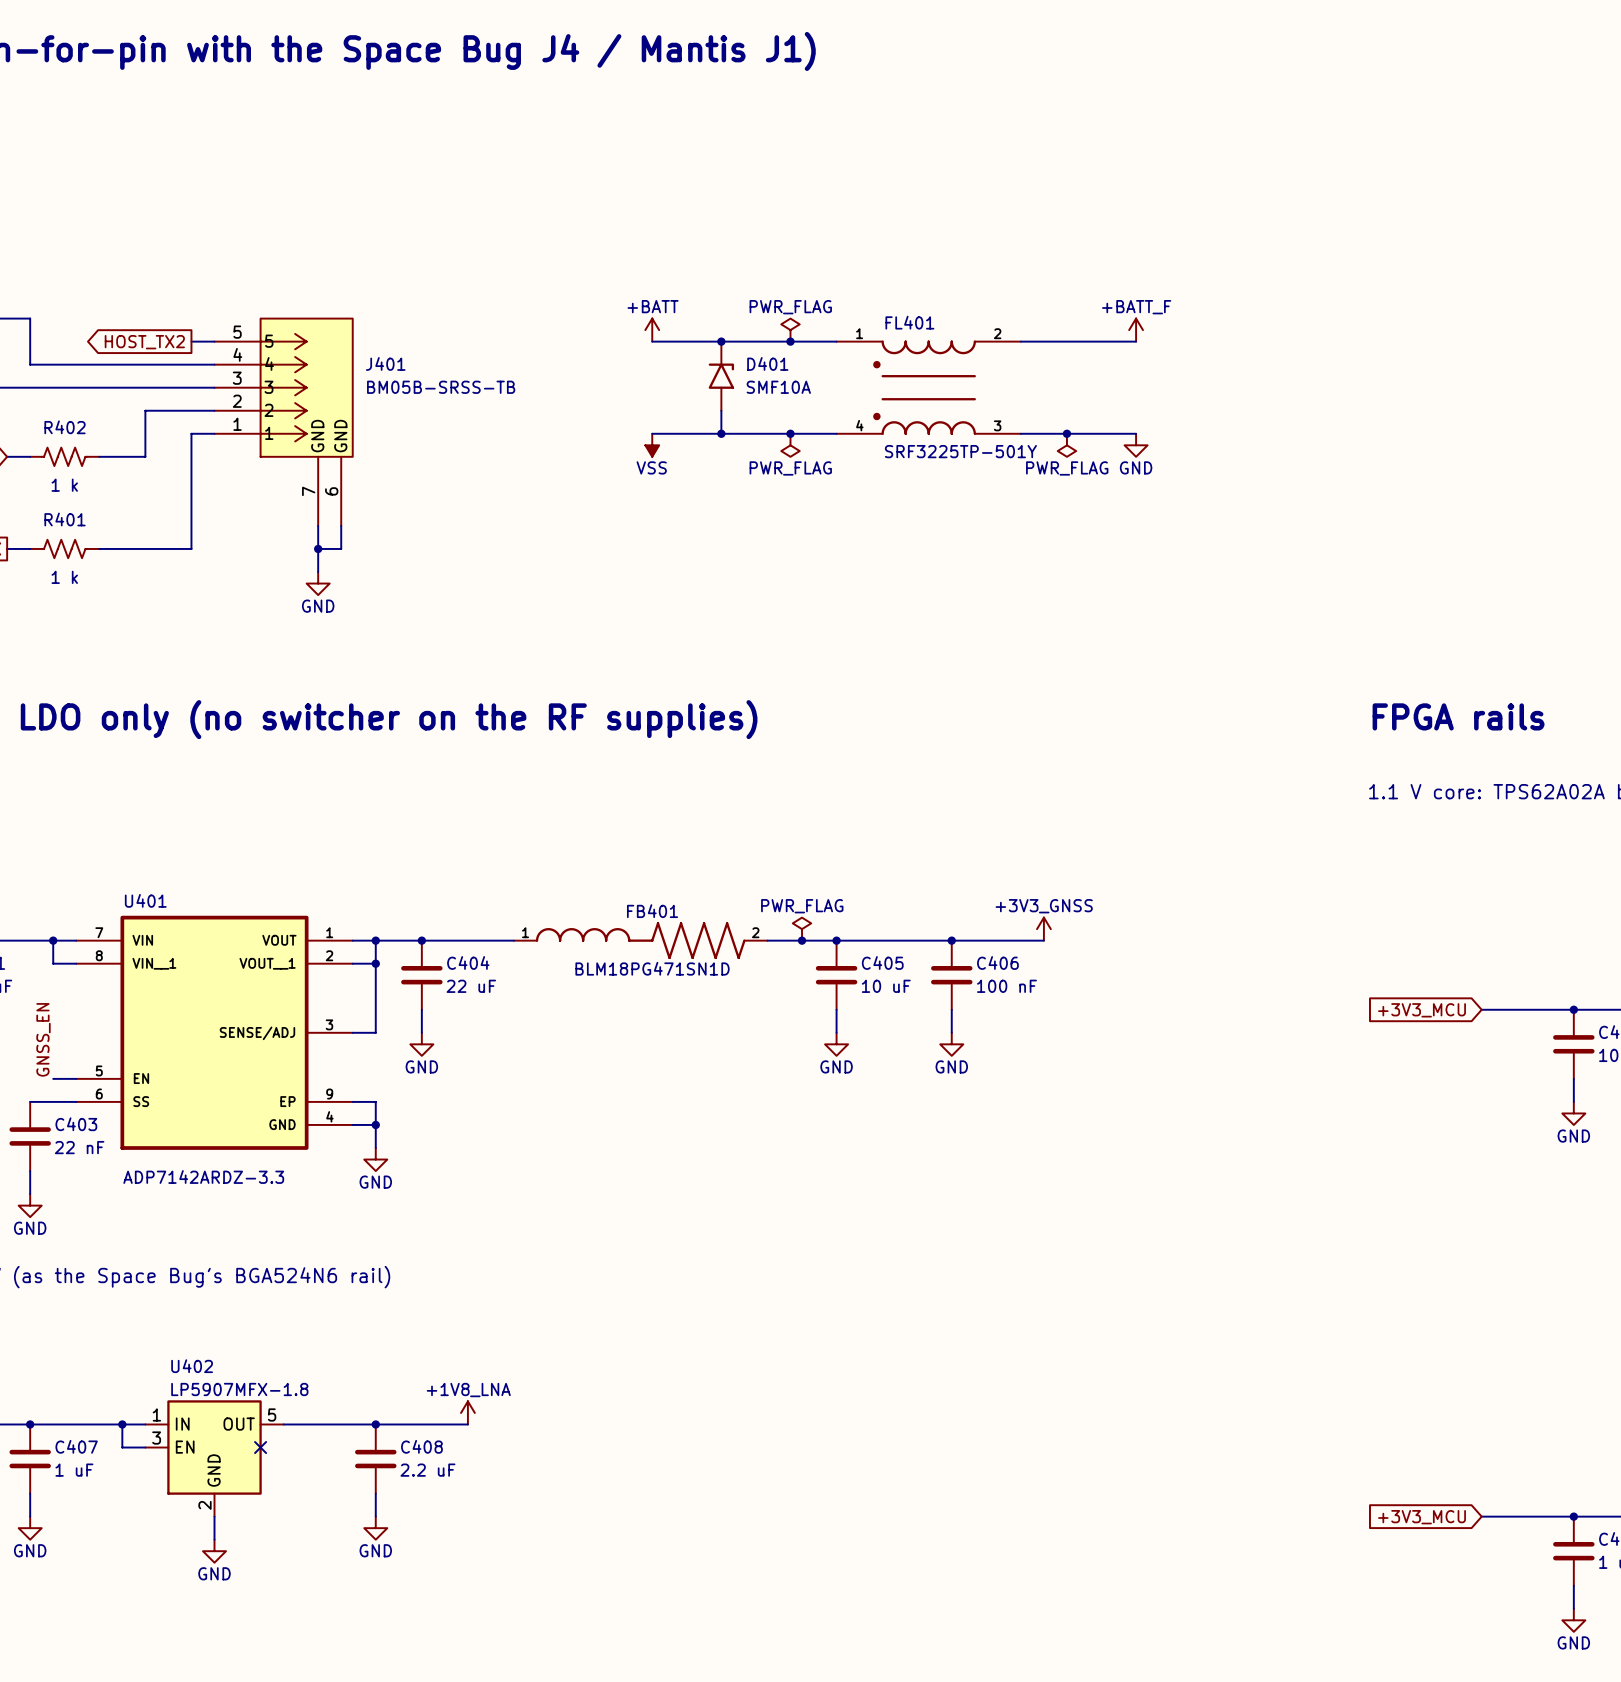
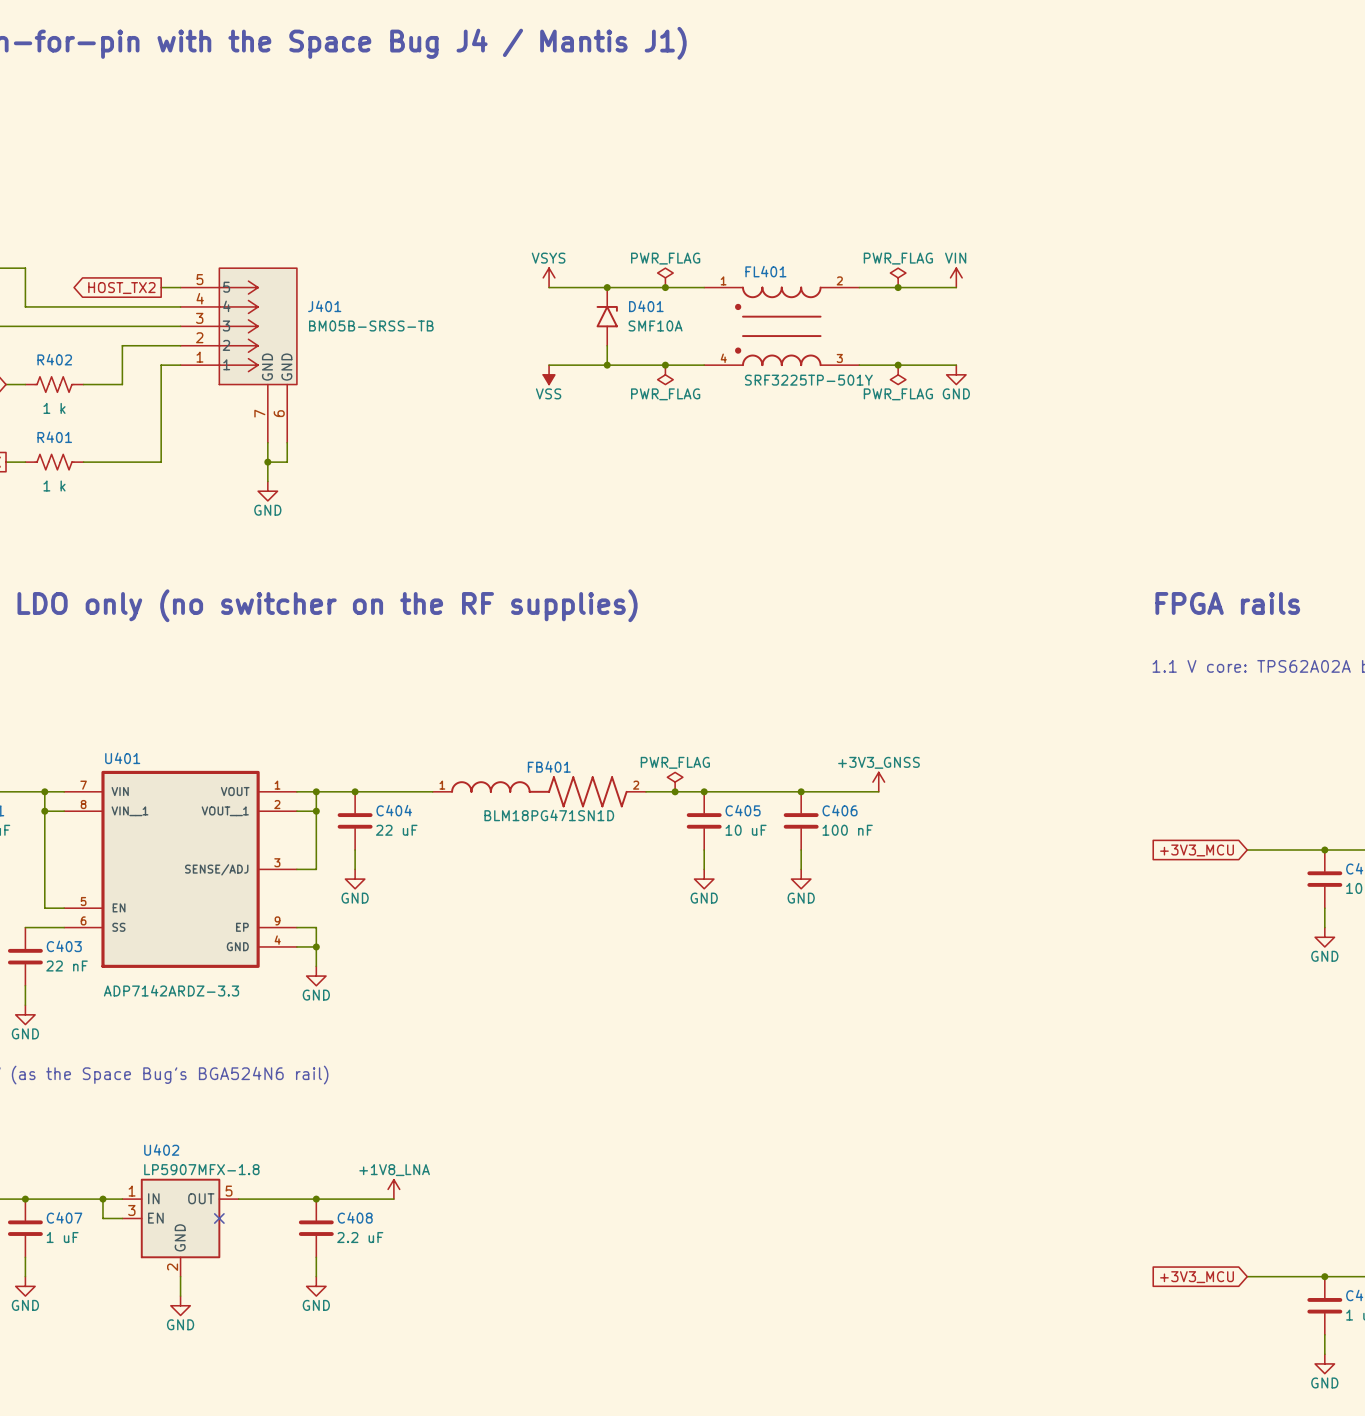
power symbol: +BATT (652, 330) -> VSYS (549, 277)
power symbol: none -> PWR_FLAG (898, 277)
power symbol: +BATT_F (1136, 330) -> VIN (956, 277)
junction: none -> (898, 287)
wire: none -> (44, 811) (44, 908)
junction: none -> (44, 811)
label: GNSS_EN (43, 1039) -> none

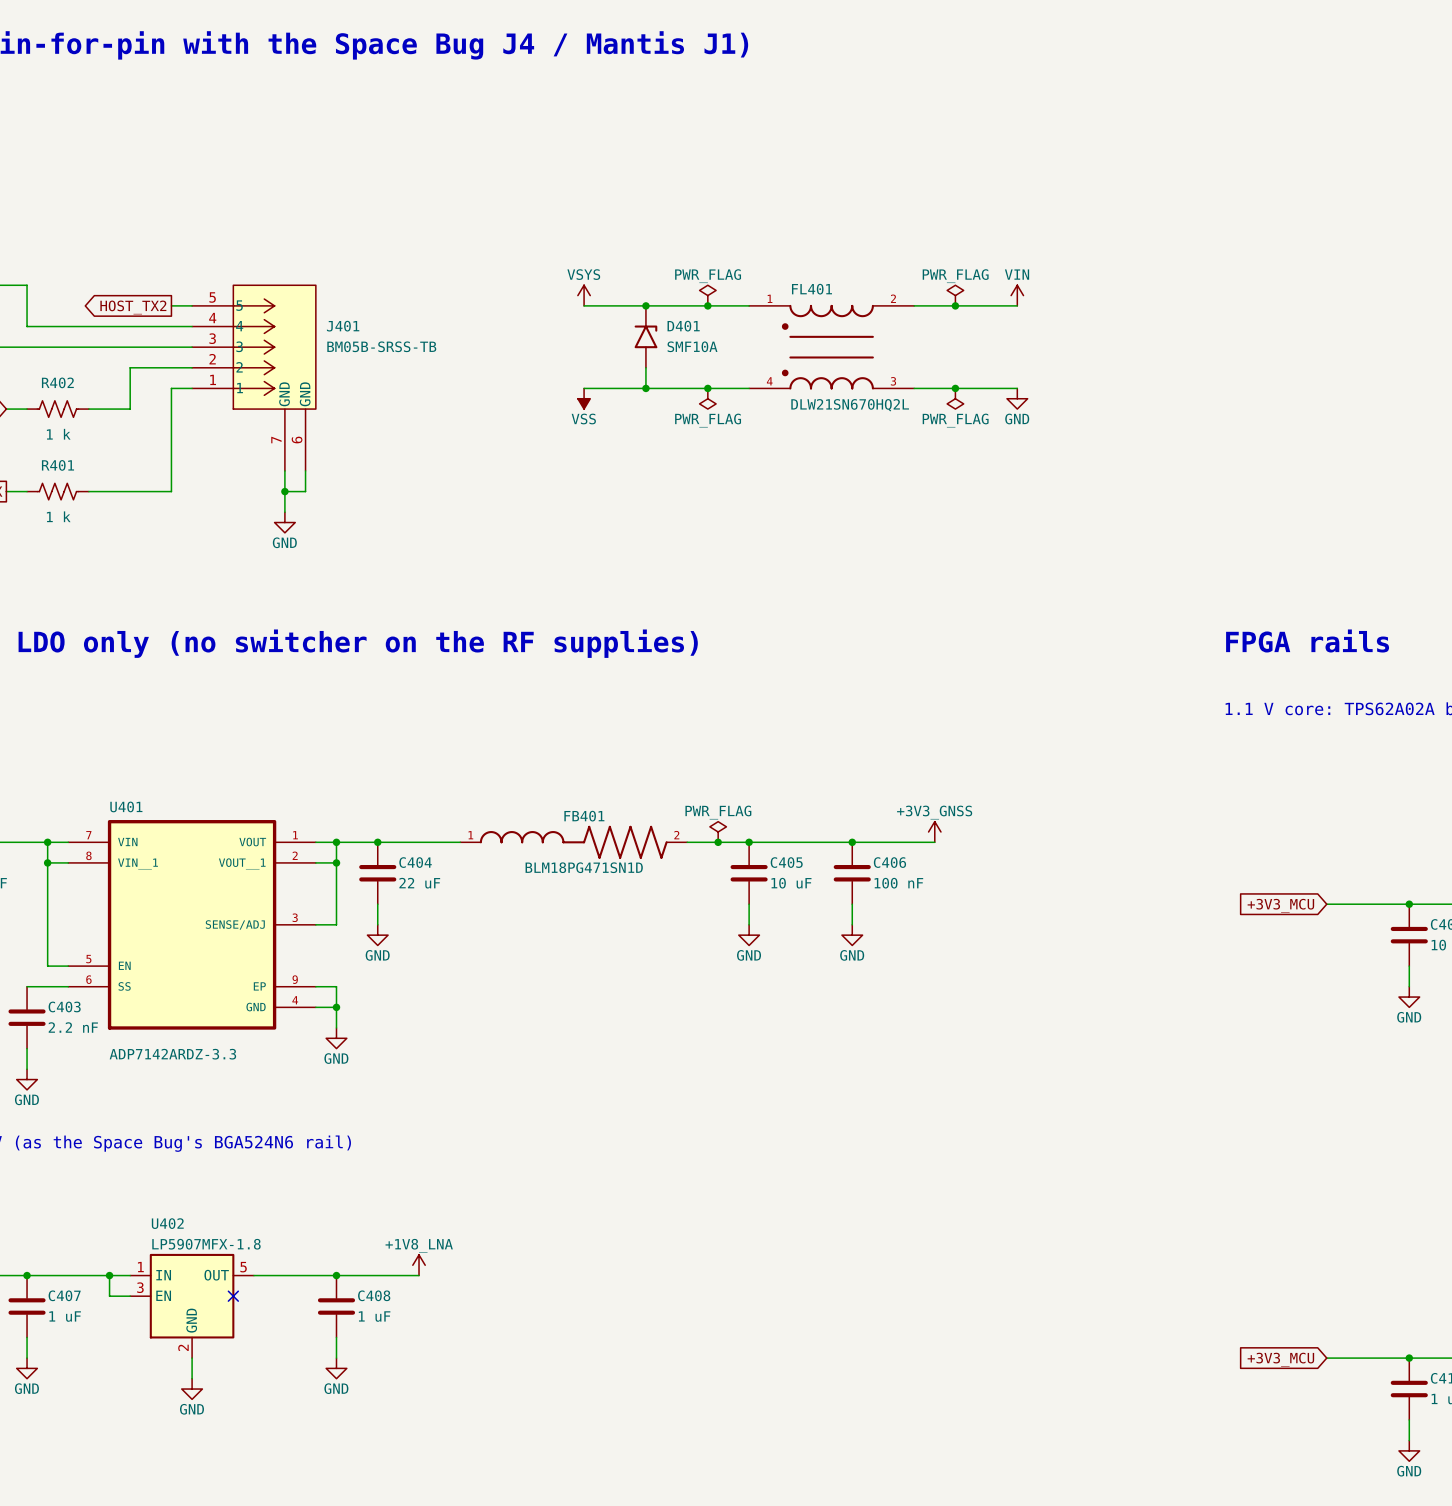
FL401 value: SRF3225TP-501Y (808, 380) -> DLW21SN670HQ2L (850, 405)
C403 value: 22 nF (67, 966) -> 2.2 nF (73, 1027)
C408 value: 2.2 uF (360, 1237) -> 1 uF (374, 1316)

